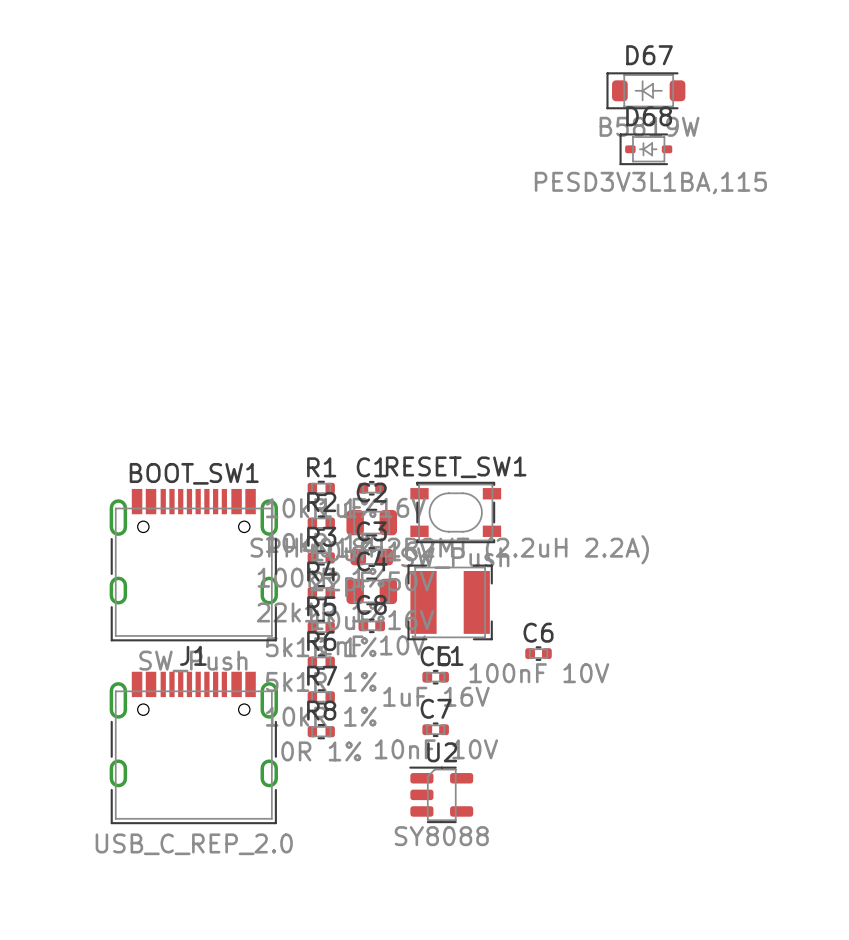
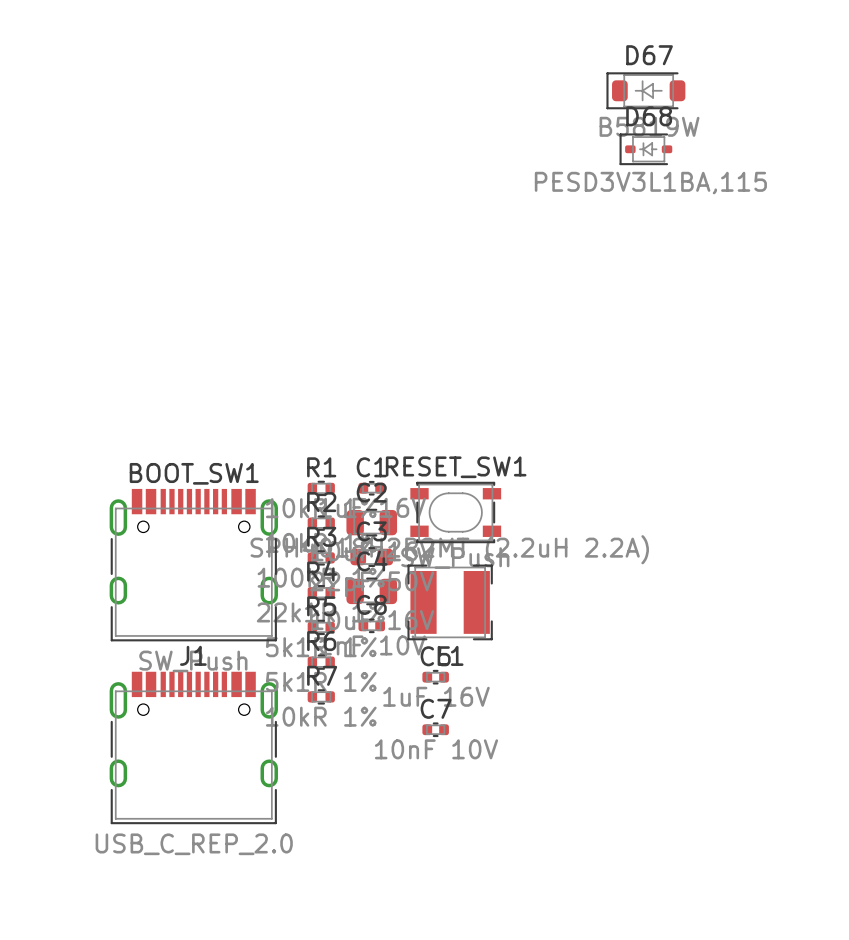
C6: 100nF 10V (538, 653) -> none
R8: 0R 1% (321, 731) -> none
U2: SY8088 (441, 794) -> none

